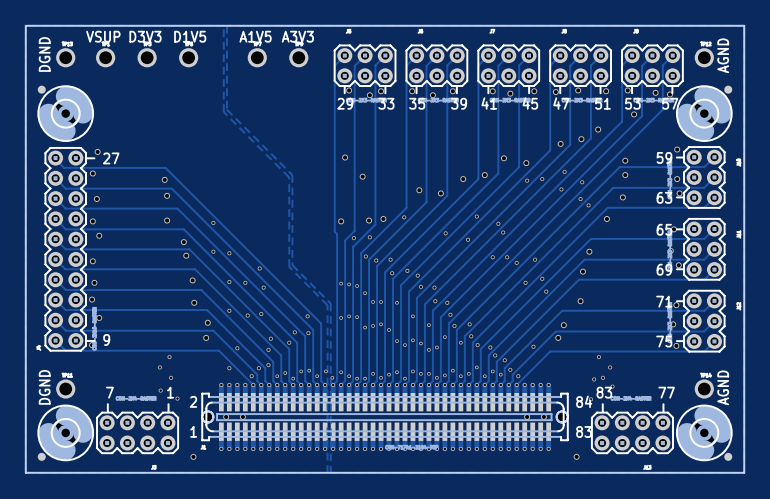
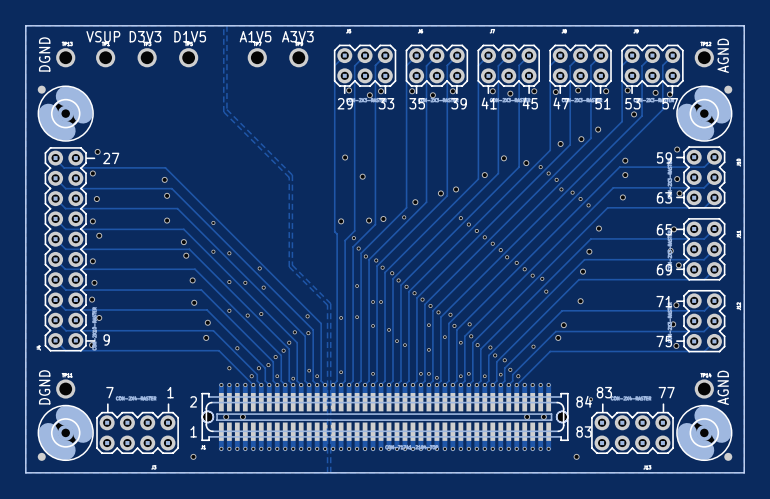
via: none -> (540, 167)
via: (564, 171) -> none
via: none -> (548, 173)
via position: (463, 179) -> (456, 189)
via: (542, 179) -> none
via: none -> (556, 179)
via: (527, 180) -> none
via: (582, 182) -> none
via position: (419, 190) -> (415, 202)
via: none -> (572, 192)
via: (476, 216) -> none
via: none -> (460, 218)
via position: (606, 218) -> (598, 228)
via: (498, 223) -> none
via: none -> (468, 224)
via: none -> (476, 230)
via: (503, 232) -> none
via: (445, 233) -> none
via position: (369, 237) -> (358, 248)
via: none -> (484, 237)
via: (468, 239) -> none
via: none -> (492, 243)
via: none -> (500, 250)
via: (492, 257) -> none
via: (390, 259) -> none
via: (535, 259) -> none
via: none -> (382, 267)
via: none -> (524, 269)
via: (407, 270) -> none
via: (417, 275) -> none
via: none -> (532, 275)
via: none -> (398, 280)
via: (525, 282) -> none
via: (341, 283) -> none
via: (349, 284) -> none
via: none -> (406, 286)
via: (420, 286) -> none
via: (434, 287) -> none
via: (365, 293) -> none
via: none -> (414, 293)
via: none -> (422, 299)
via: (435, 301) -> none
via: (396, 302) -> none
via: (447, 302) -> none
via: none -> (430, 305)
via: none -> (438, 312)
via: (349, 316) -> none
via: (412, 316) -> none
via: (381, 324) -> none
via: (365, 327) -> none
via: (270, 338) -> none
via: (412, 340) -> none
via: (420, 343) -> none
via: (436, 347) -> none
via: (268, 349) -> none
via: none -> (283, 350)
via: (169, 357) -> none
via: none -> (275, 357)
via: (598, 357) -> none
via: (159, 367) -> none
via: (476, 367) -> none
via: (610, 367) -> none
via: (452, 370) -> none
via: (301, 371) -> none
via: (325, 371) -> none
via: (412, 371) -> none
via: (492, 371) -> none
via: (396, 372) -> none
via: (285, 373) -> none
via: (389, 374) -> none
via: (444, 375) -> none
via: (349, 376) -> none
via: (171, 377) -> none
via: (332, 377) -> none
via: (381, 377) -> none
via: (602, 377) -> none
via: (357, 378) -> none
via: (365, 378) -> none
via: (404, 378) -> none
via: (594, 379) -> none
via: (612, 386) -> none
via: (160, 390) -> none
via: (177, 398) -> none

